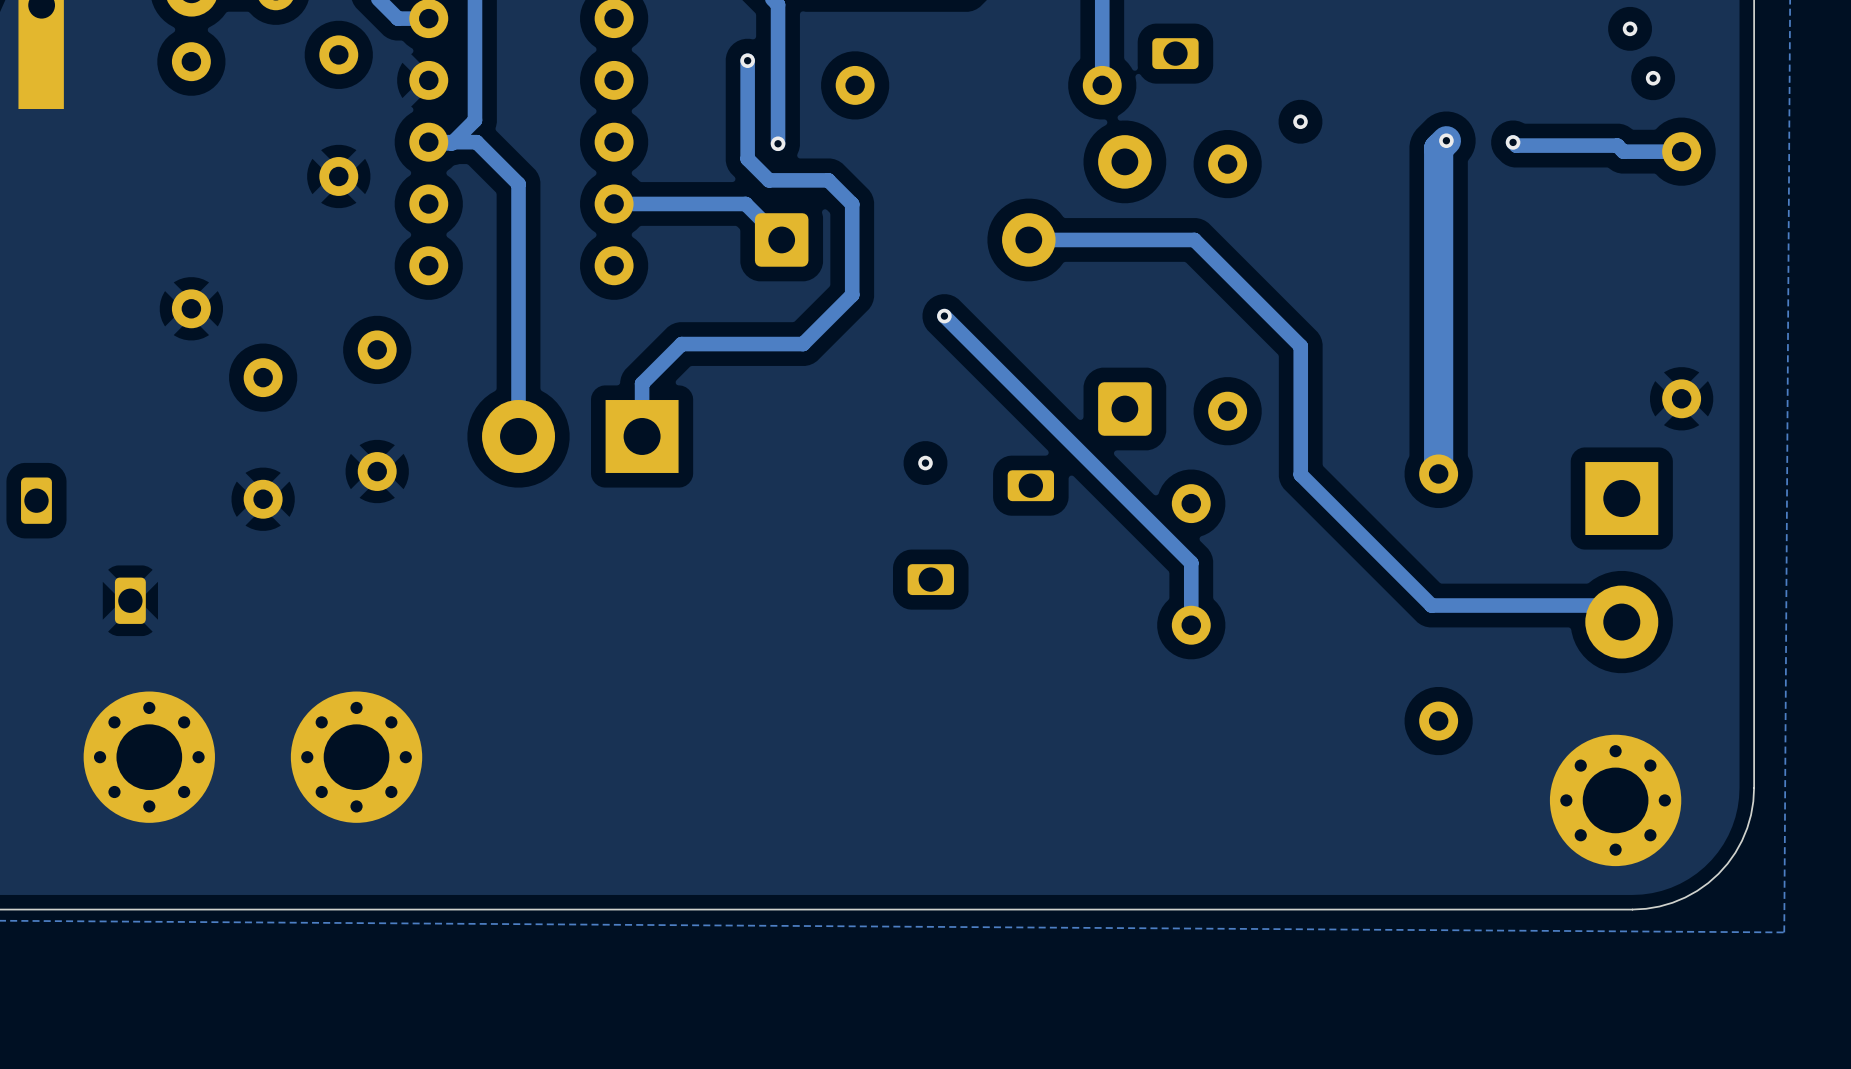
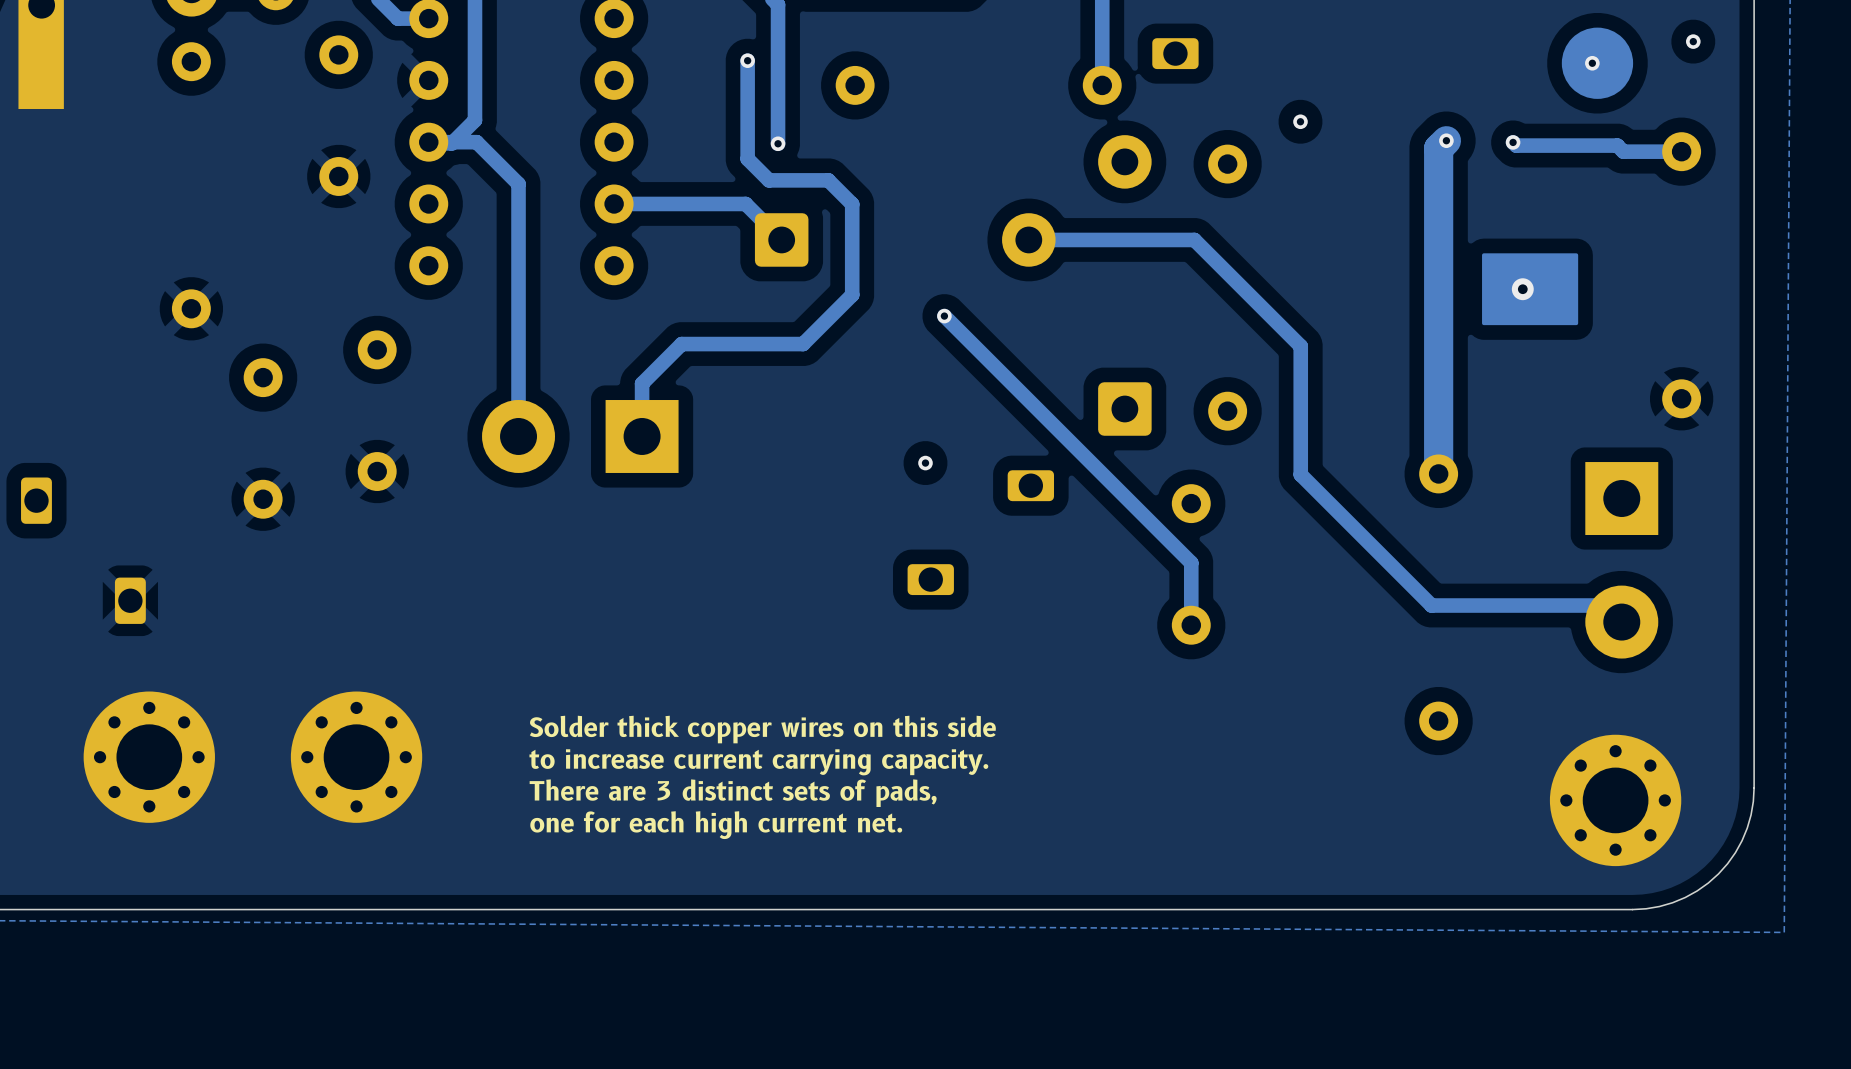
drawing: none -> [1561, 27, 1634, 99]
via: (1630, 28) -> none
via: none -> (1693, 41)
via: none -> (1592, 63)
via: (1653, 78) -> none
drawing: none -> [1482, 253, 1579, 326]
via: none -> (1522, 289)
text: none -> Solder thick copper wires on this side (762, 729)
text: none -> to increase current carrying capacity. (758, 762)
text: none -> There are 3 distinct sets of pads, (733, 793)
text: none -> one for each high current net. (716, 825)

